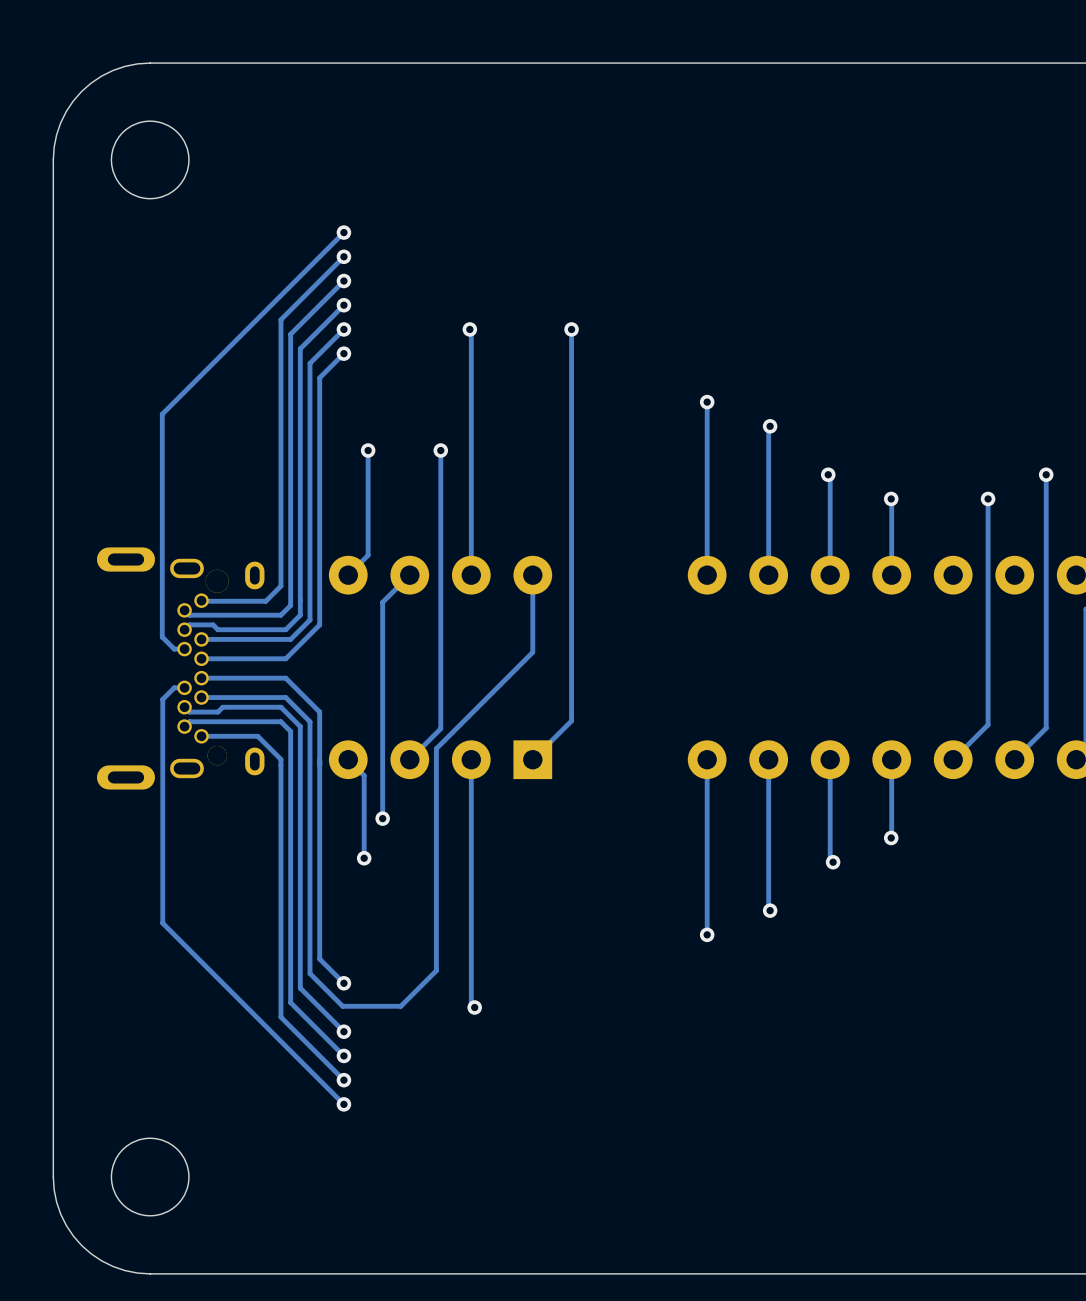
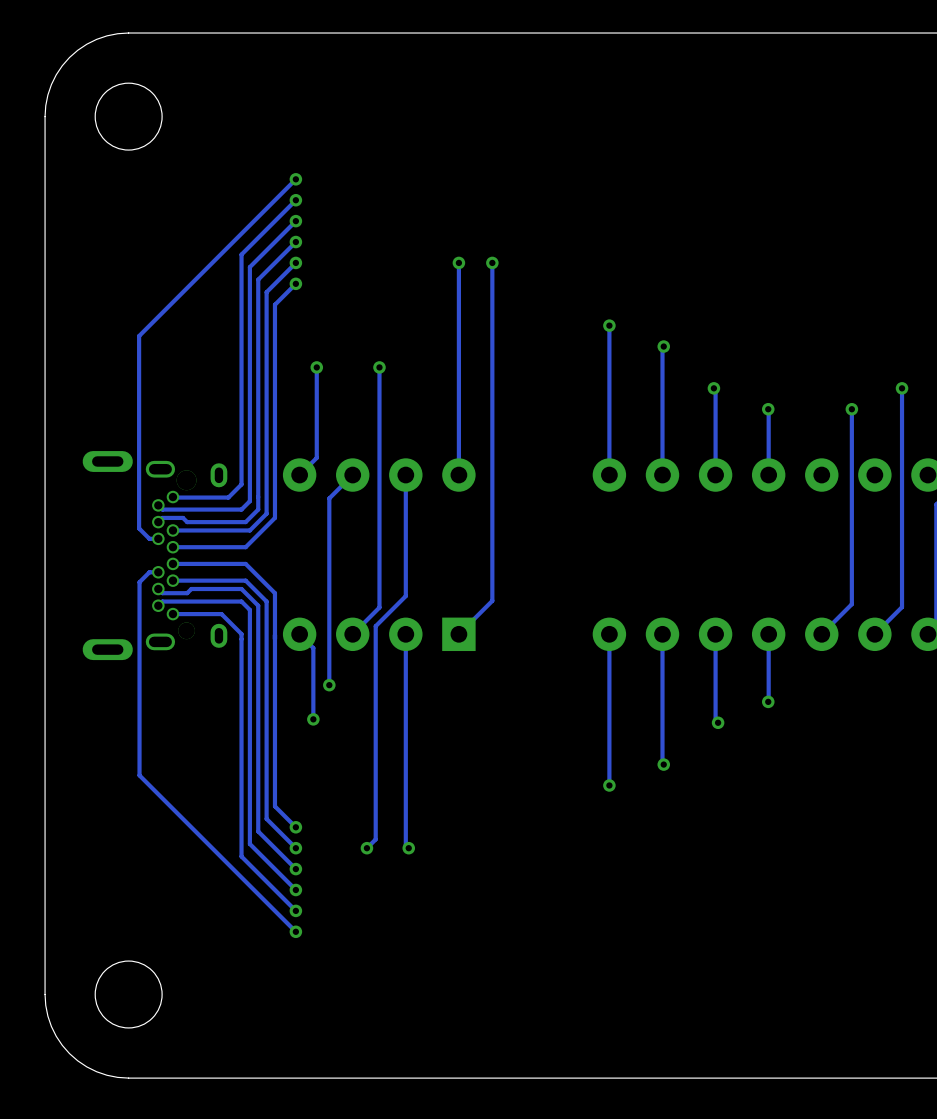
track: (469, 329) (471, 575) -> none
via position: (469, 329) -> (458, 262)
track: none -> (458, 262) (458, 475)
track: (532, 575) (532, 652) (436, 750) -> (405, 475) (405, 596) (375, 626)
track: (436, 970) (400, 1006) (342, 1006) -> (375, 816) (375, 839) (366, 848)
via: none -> (295, 848)
via: none -> (366, 848)

